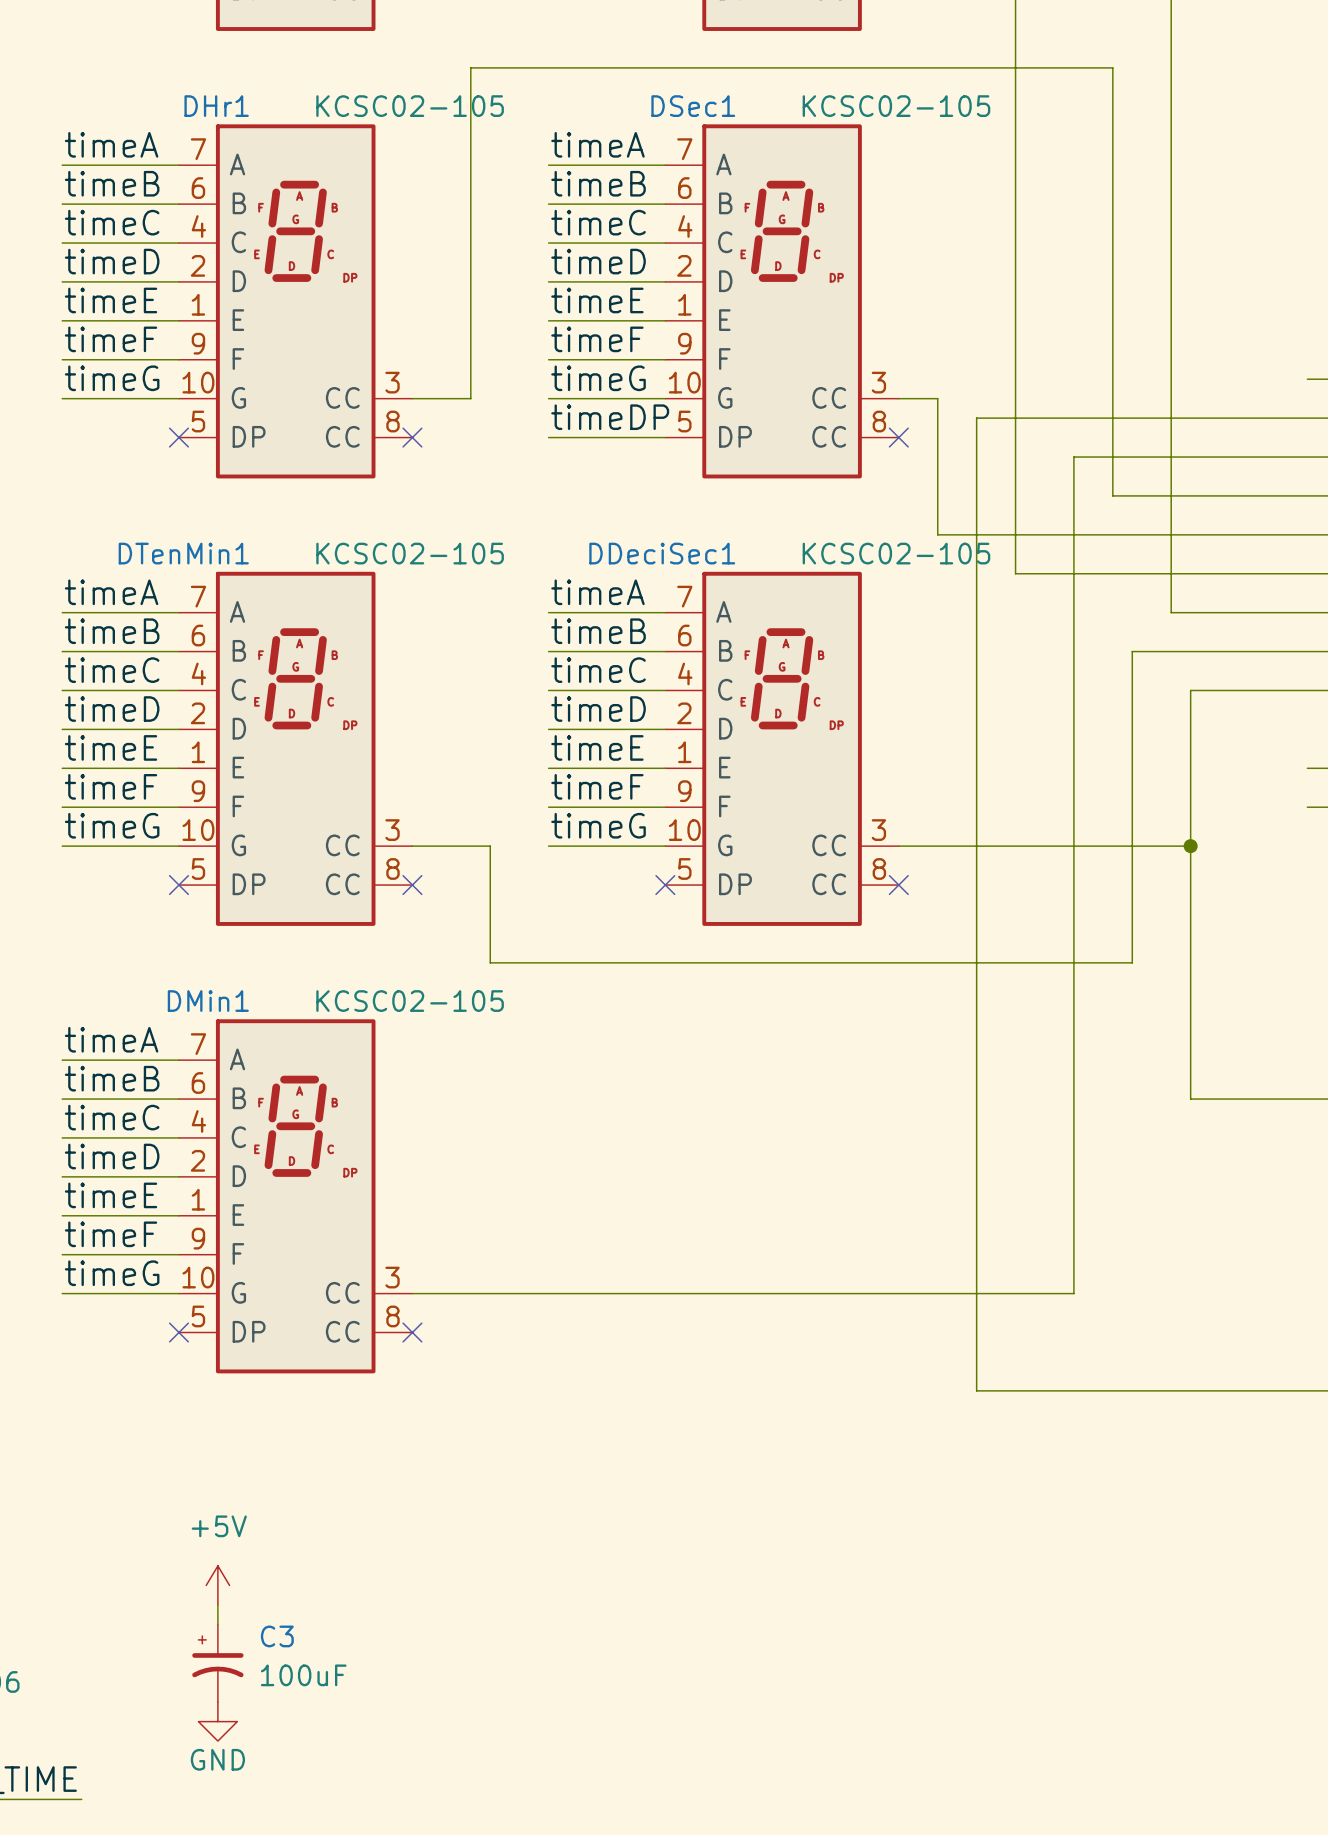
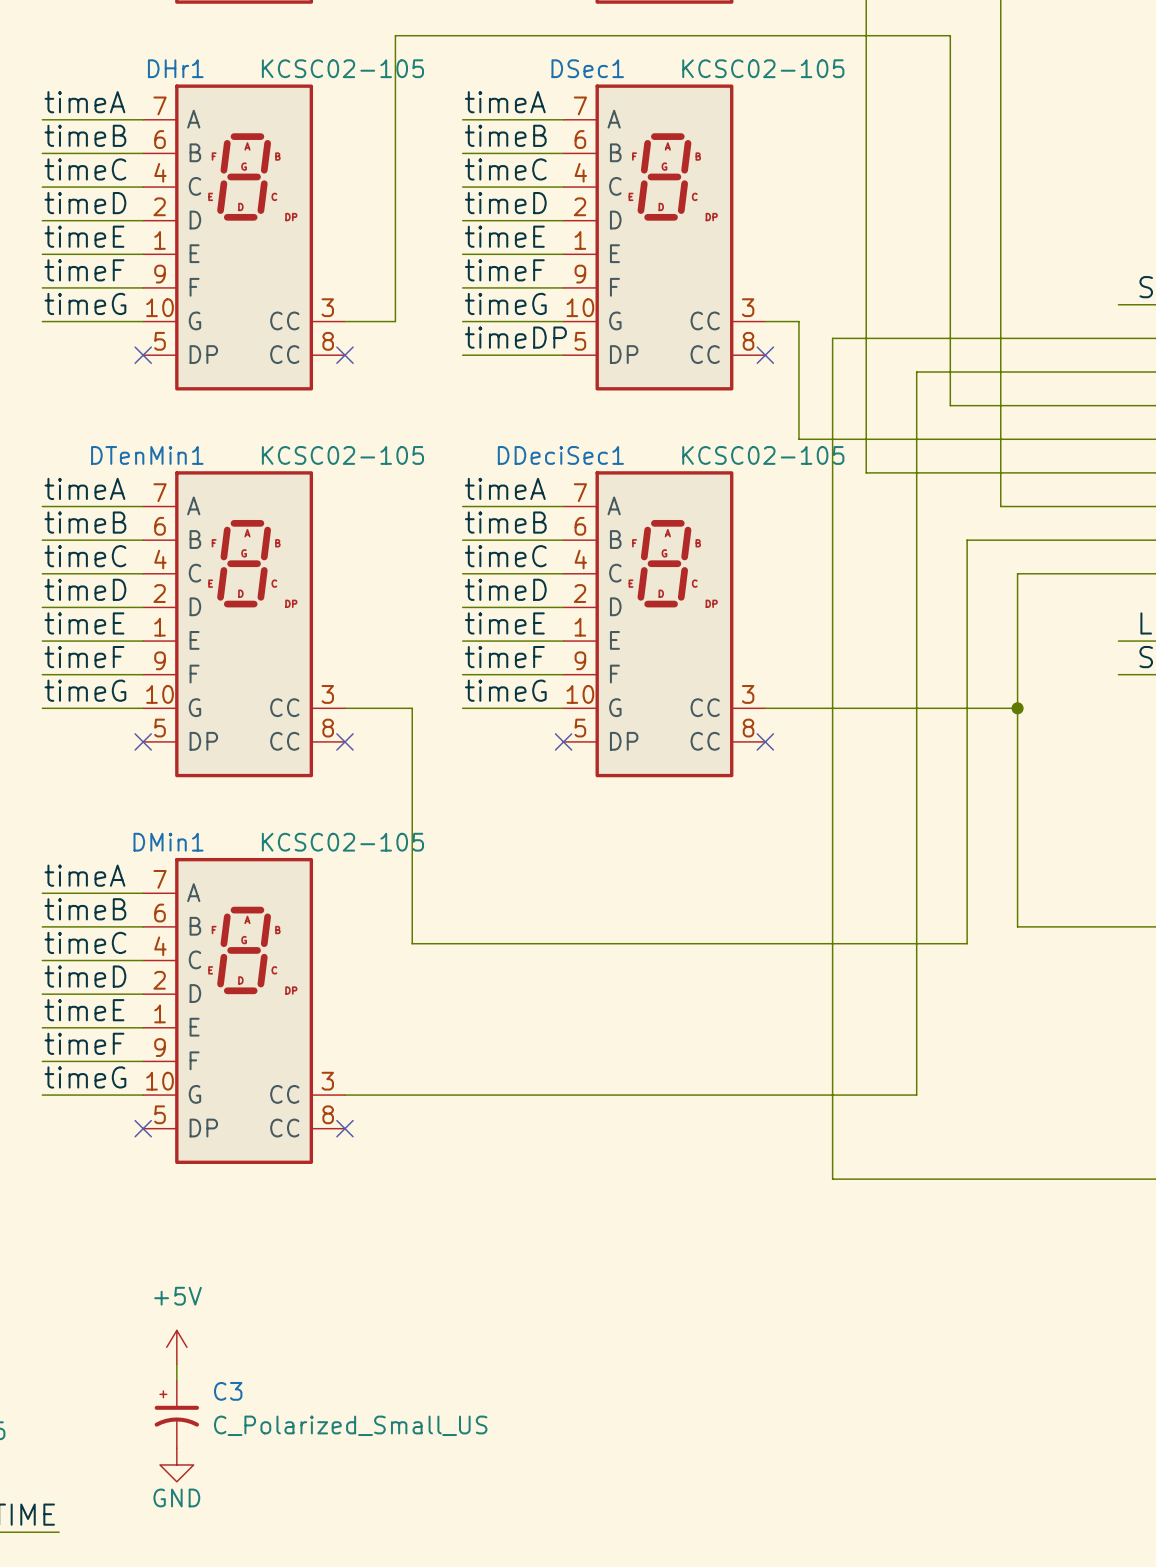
wire: (490, 962) (1132, 962) -> (412, 809) (412, 943) (967, 943) (967, 809)
C3 value: 100uF (303, 1675) -> C_Polarized_Small_US (350, 1425)

